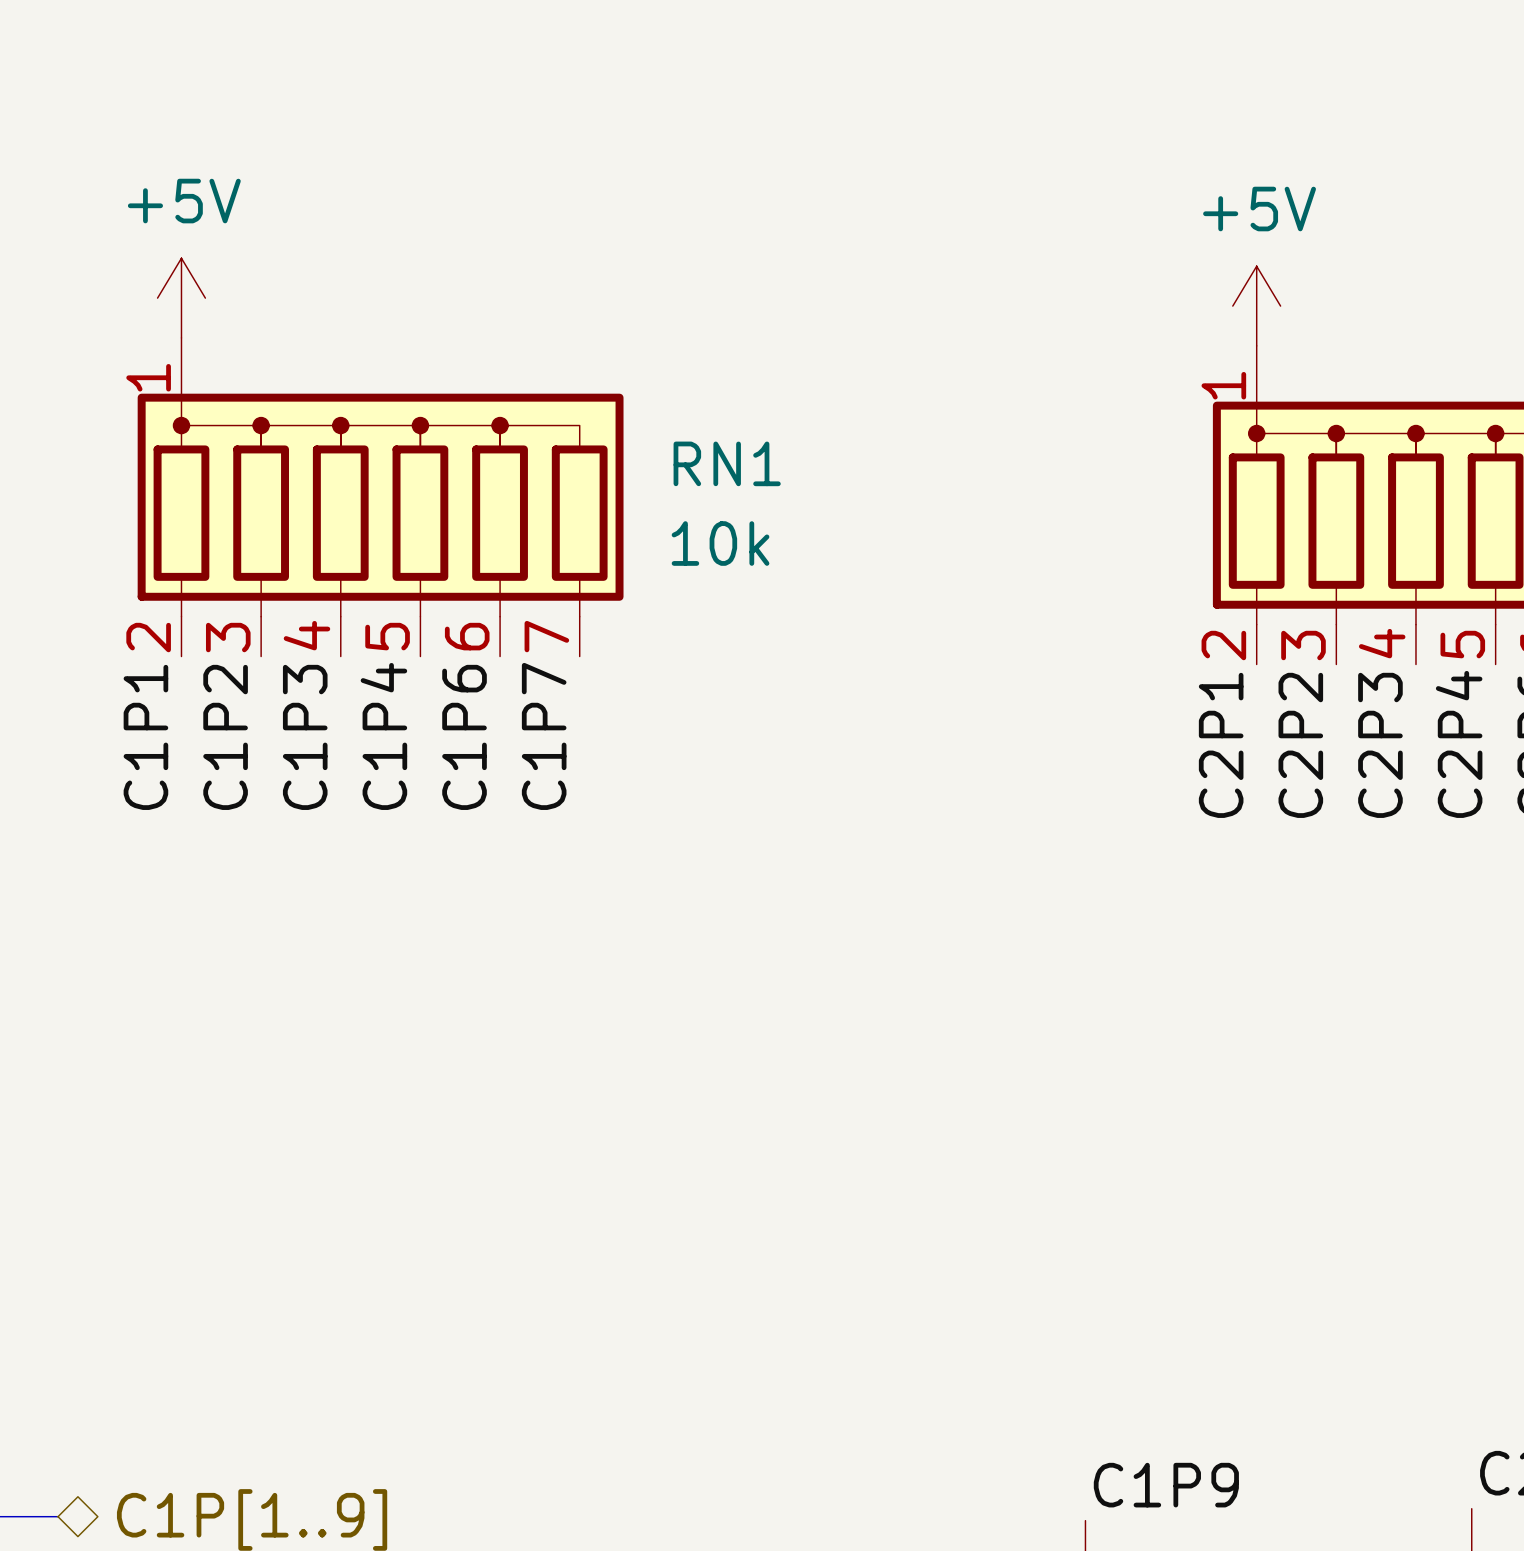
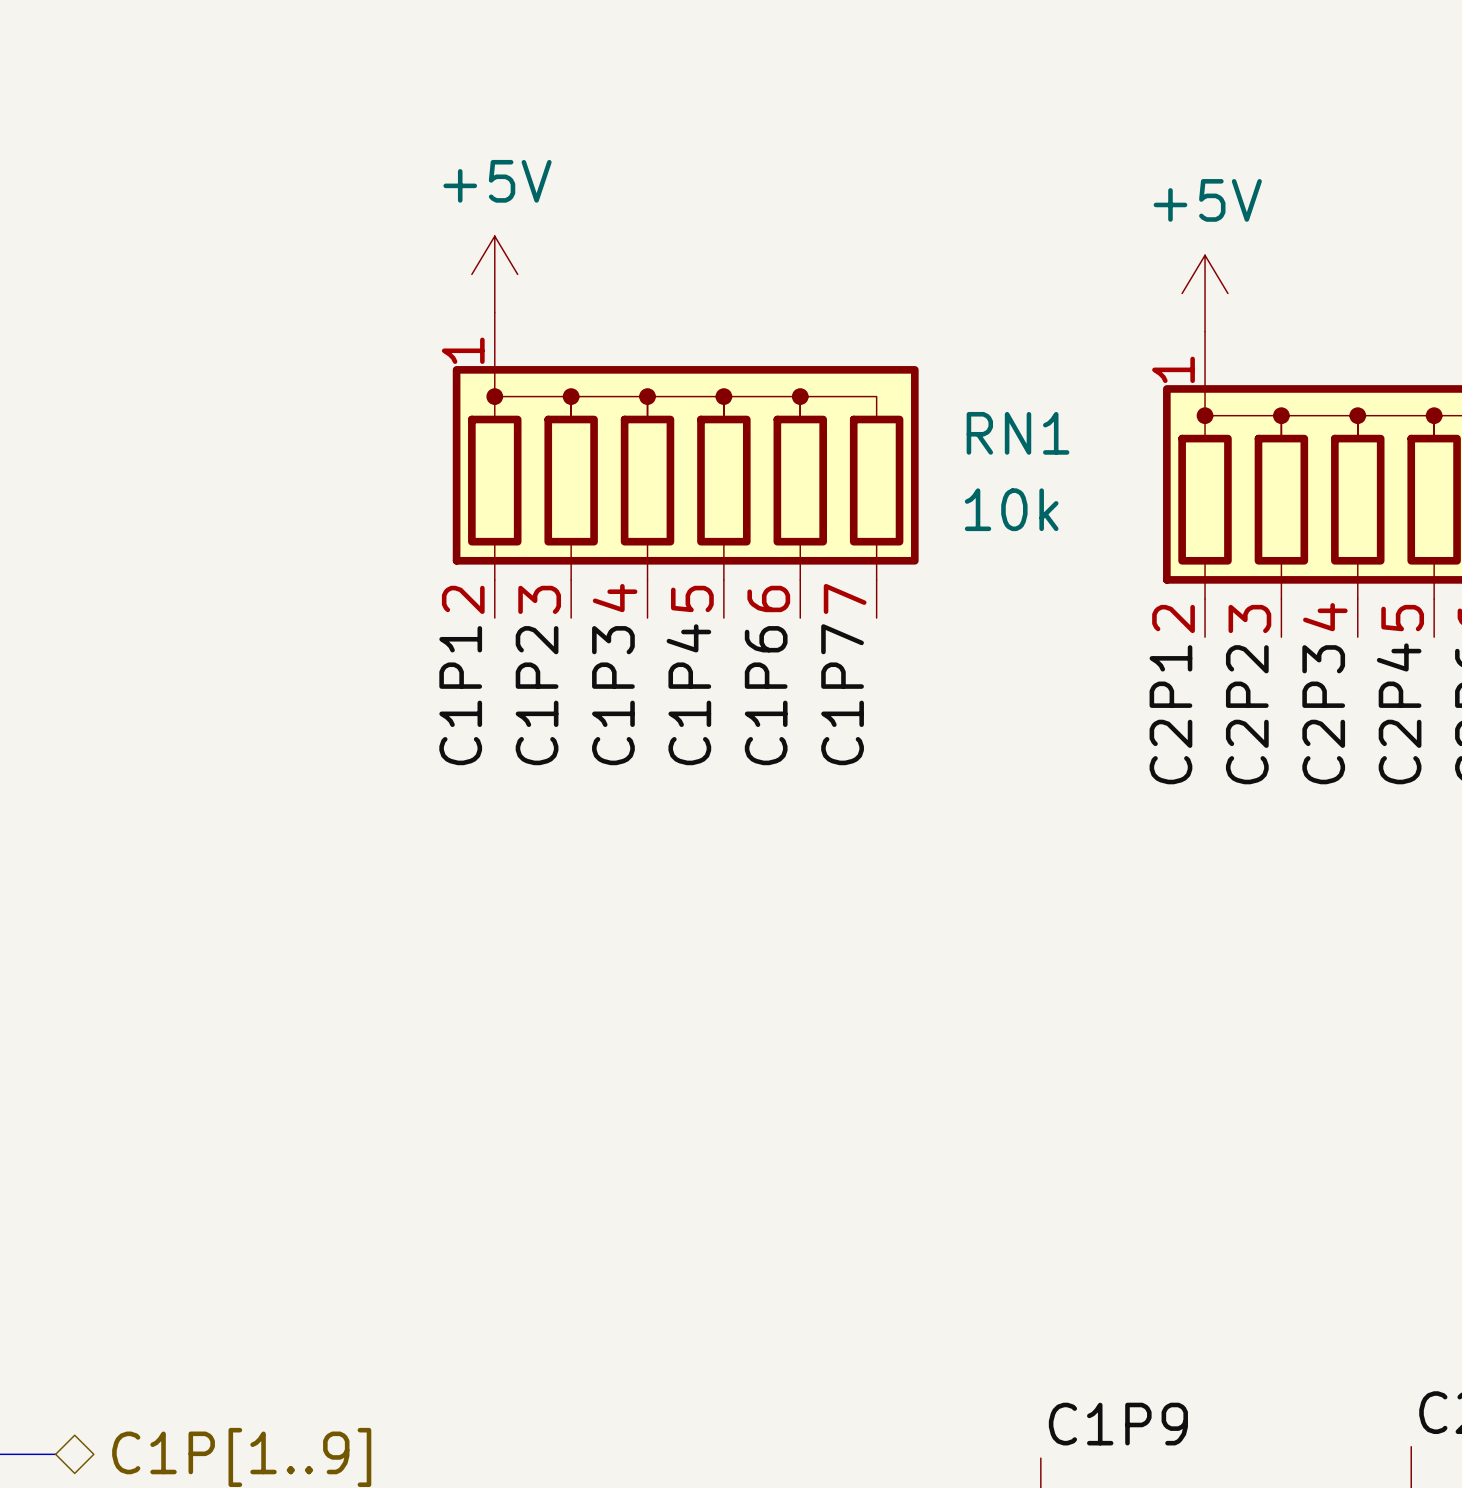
power symbol position: +5V (181, 298) -> +5V (494, 274)
RN1 position: (380, 497) -> (685, 465)
label position: C1P4 (383, 736) -> C1P4 (688, 694)
label position: C1P7 (544, 736) -> C1P7 (842, 694)
label position: C1P1 (145, 737) -> C1P1 (460, 695)
label position: C1P2 (225, 737) -> C1P2 (537, 695)
label position: C1P3 (305, 737) -> C1P3 (613, 695)
label position: C1P6 (464, 737) -> C1P6 (766, 695)

